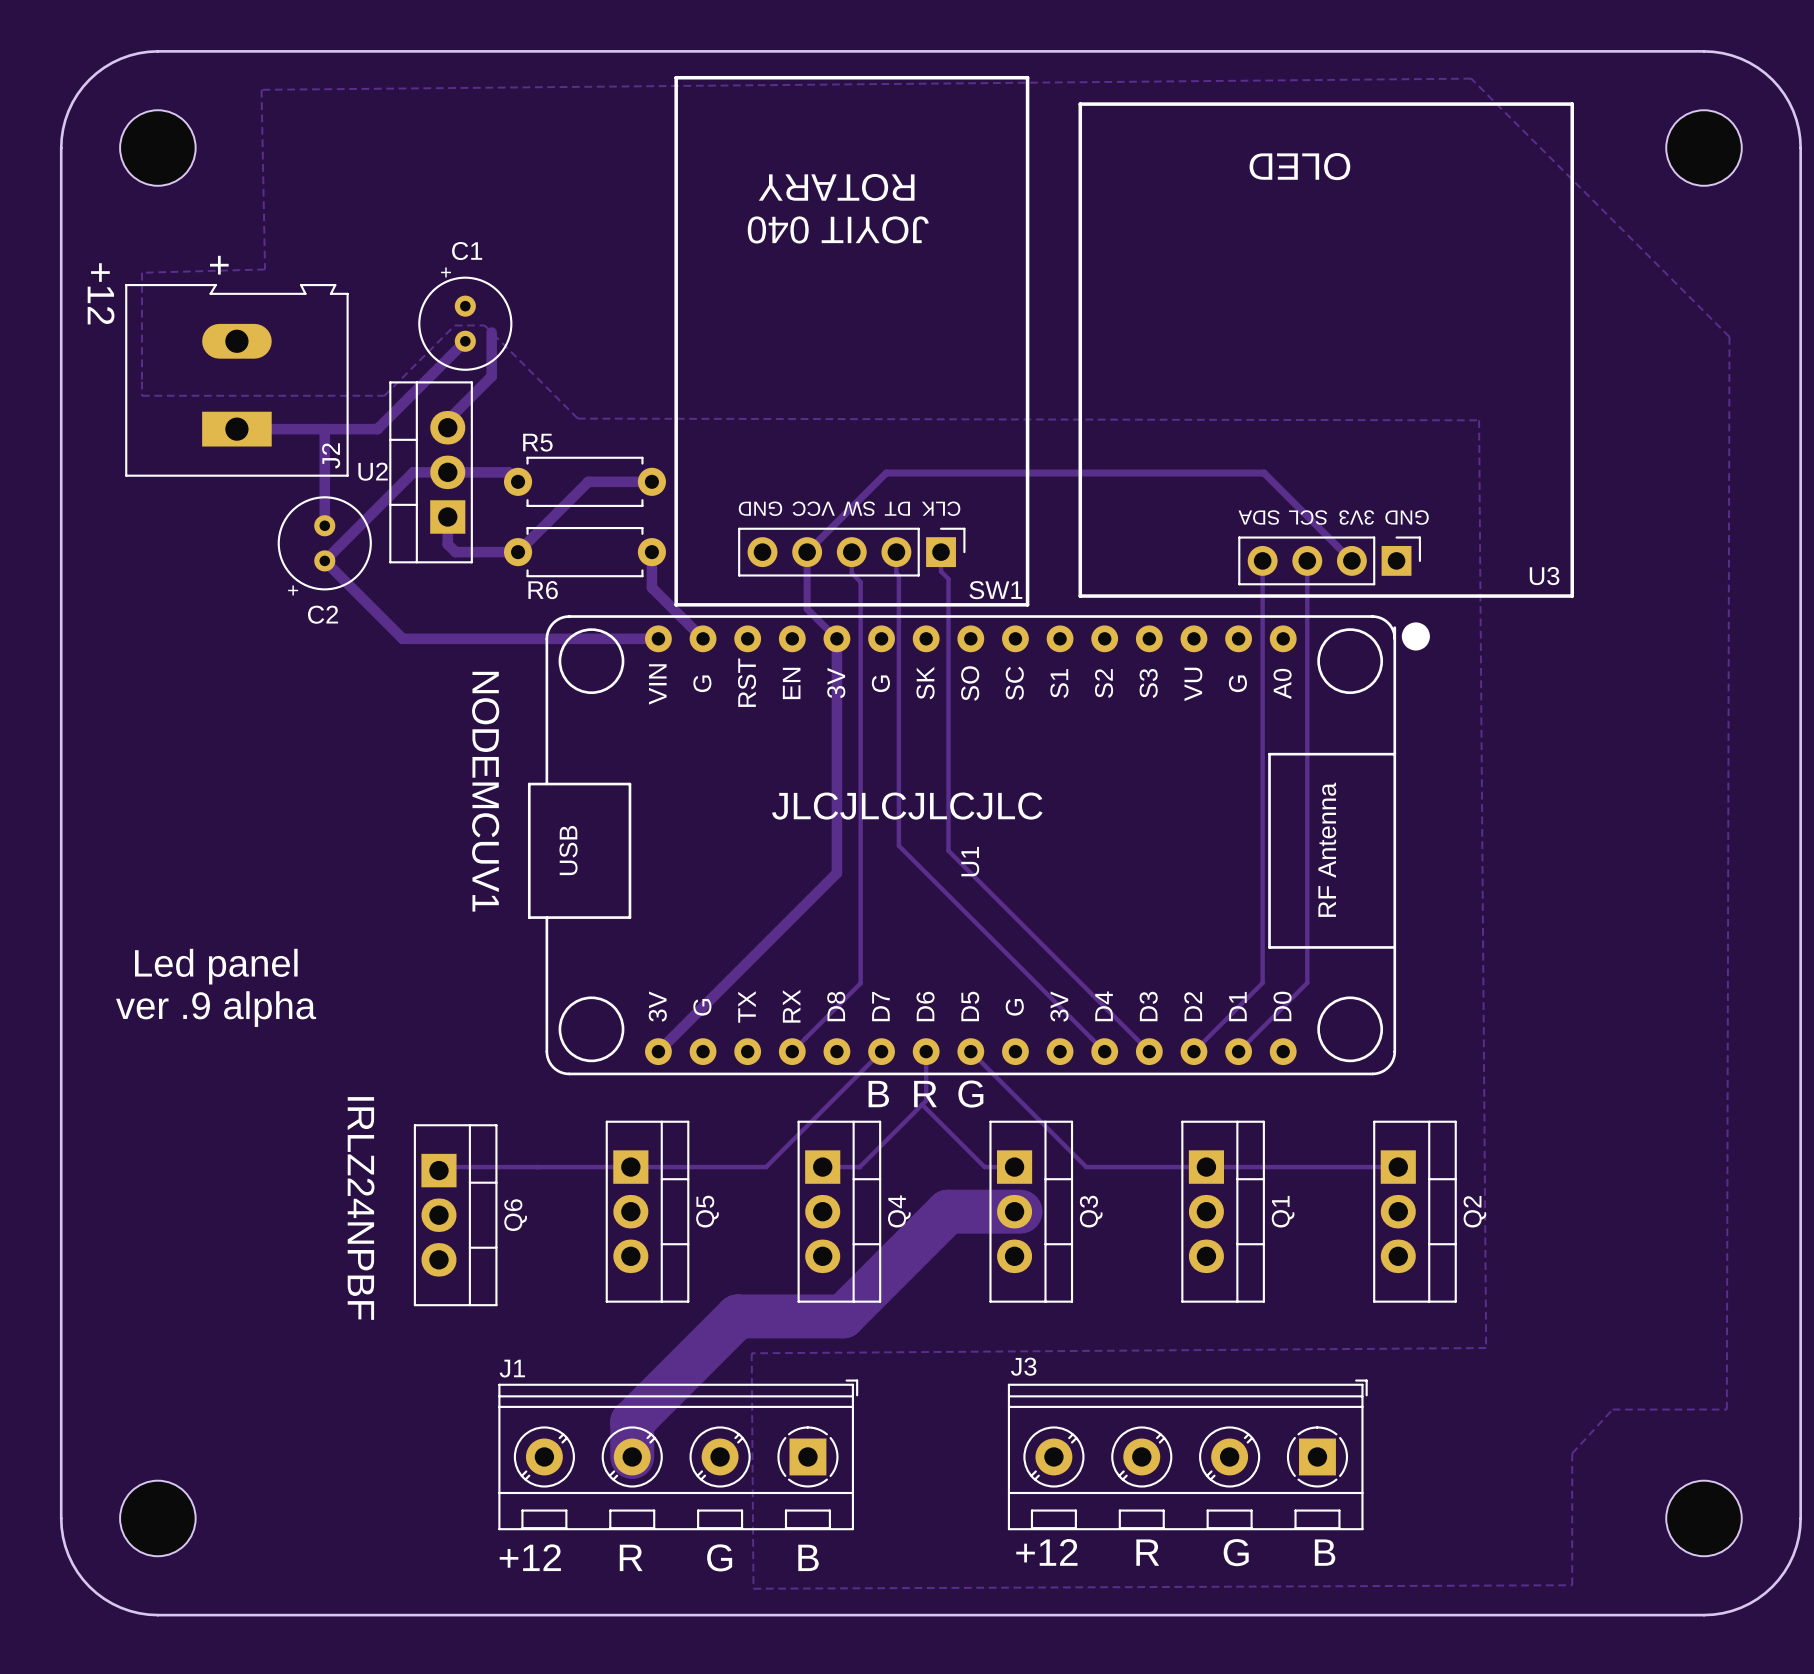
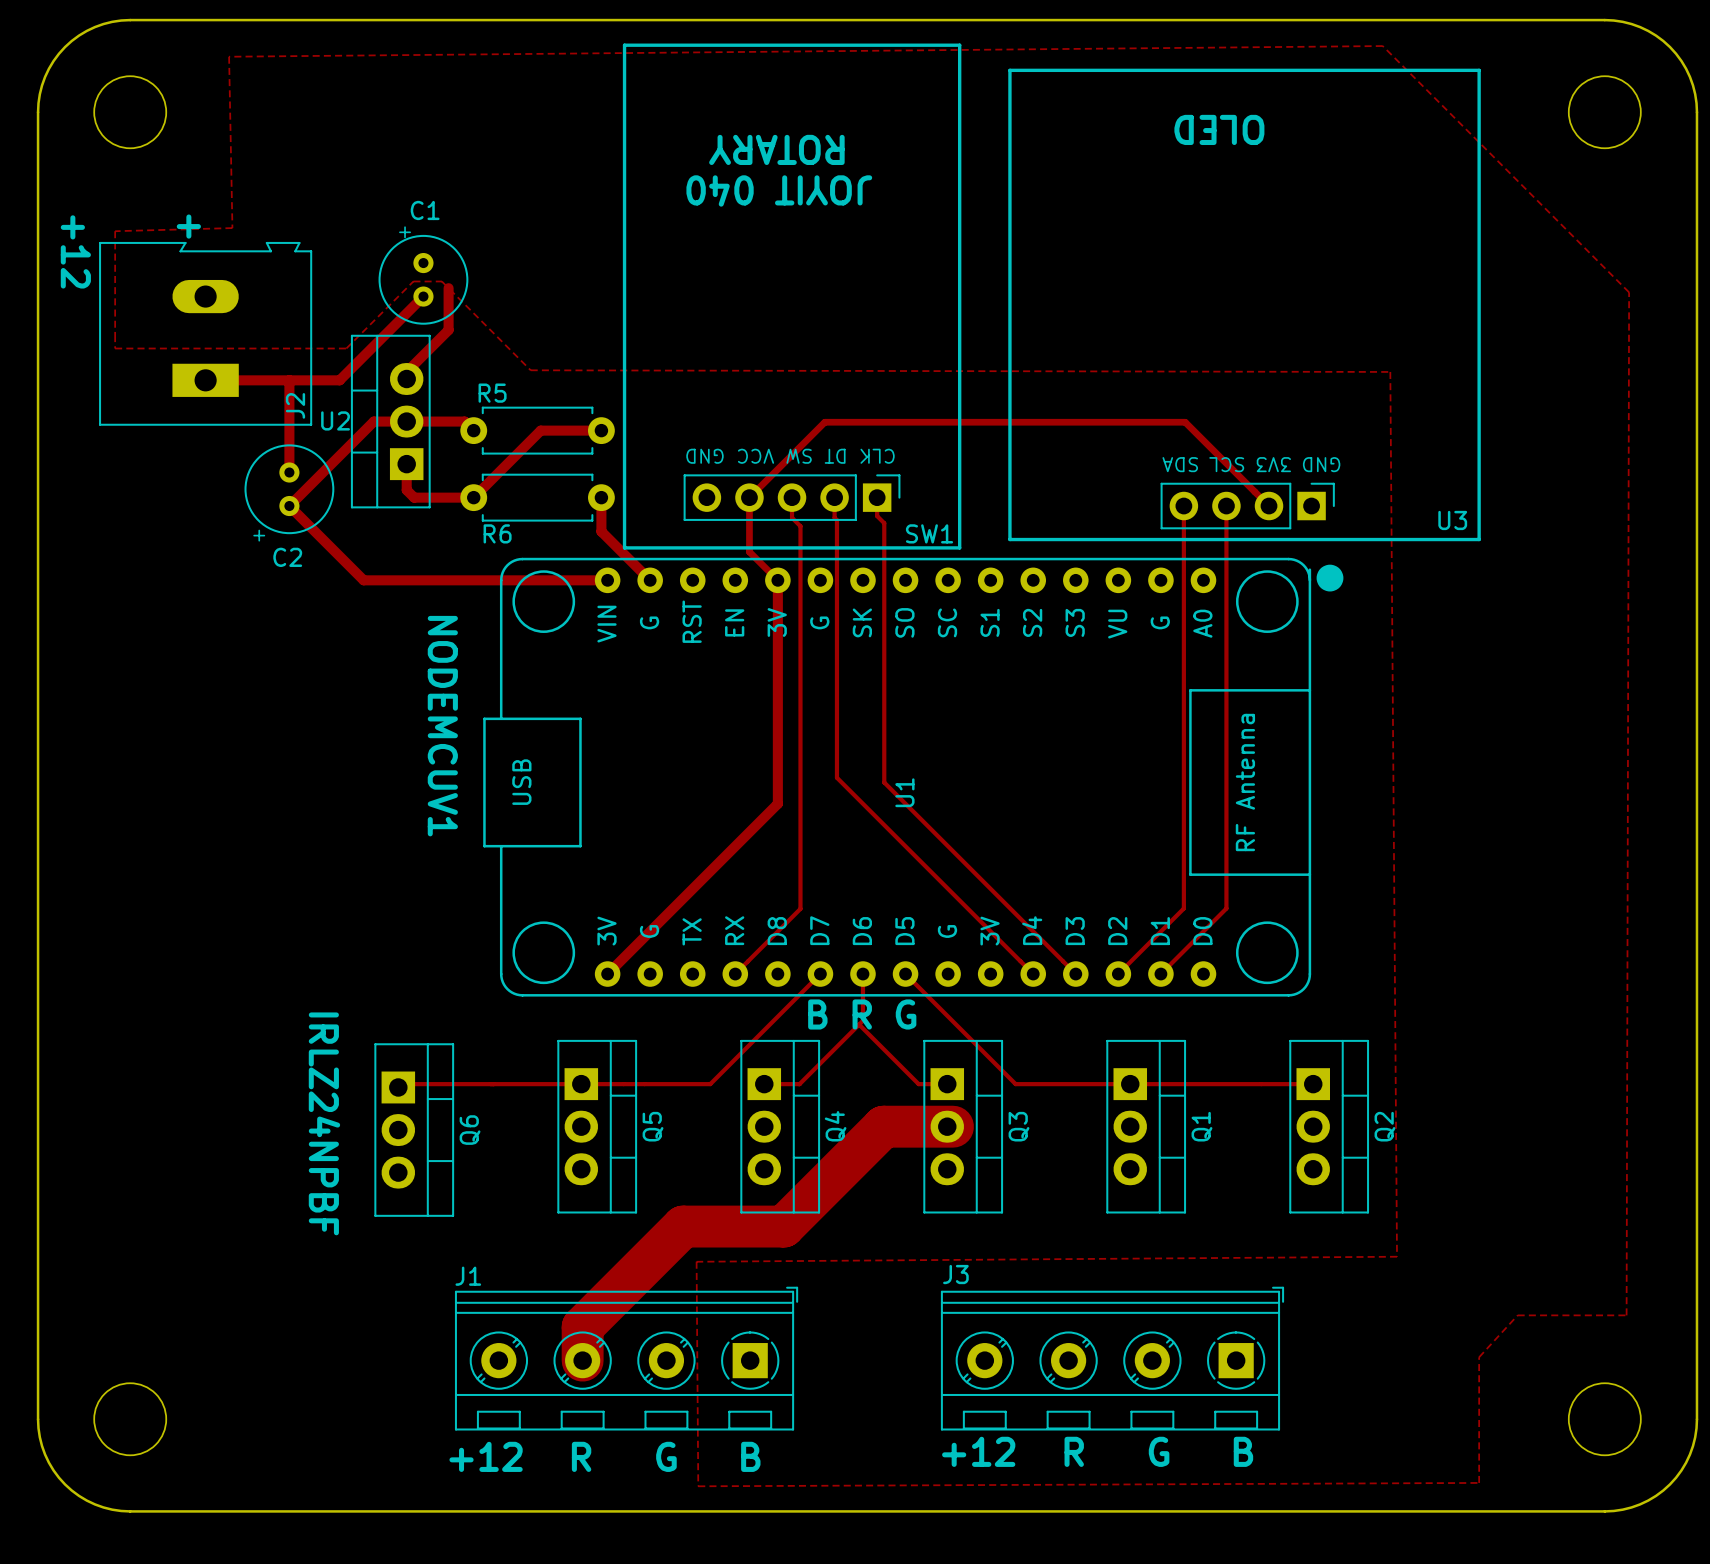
text: JLCJLCJLCJLC (907, 806) -> none
text: Led panel (216, 966) -> none
text: ver .9 alpha (216, 1009) -> none

